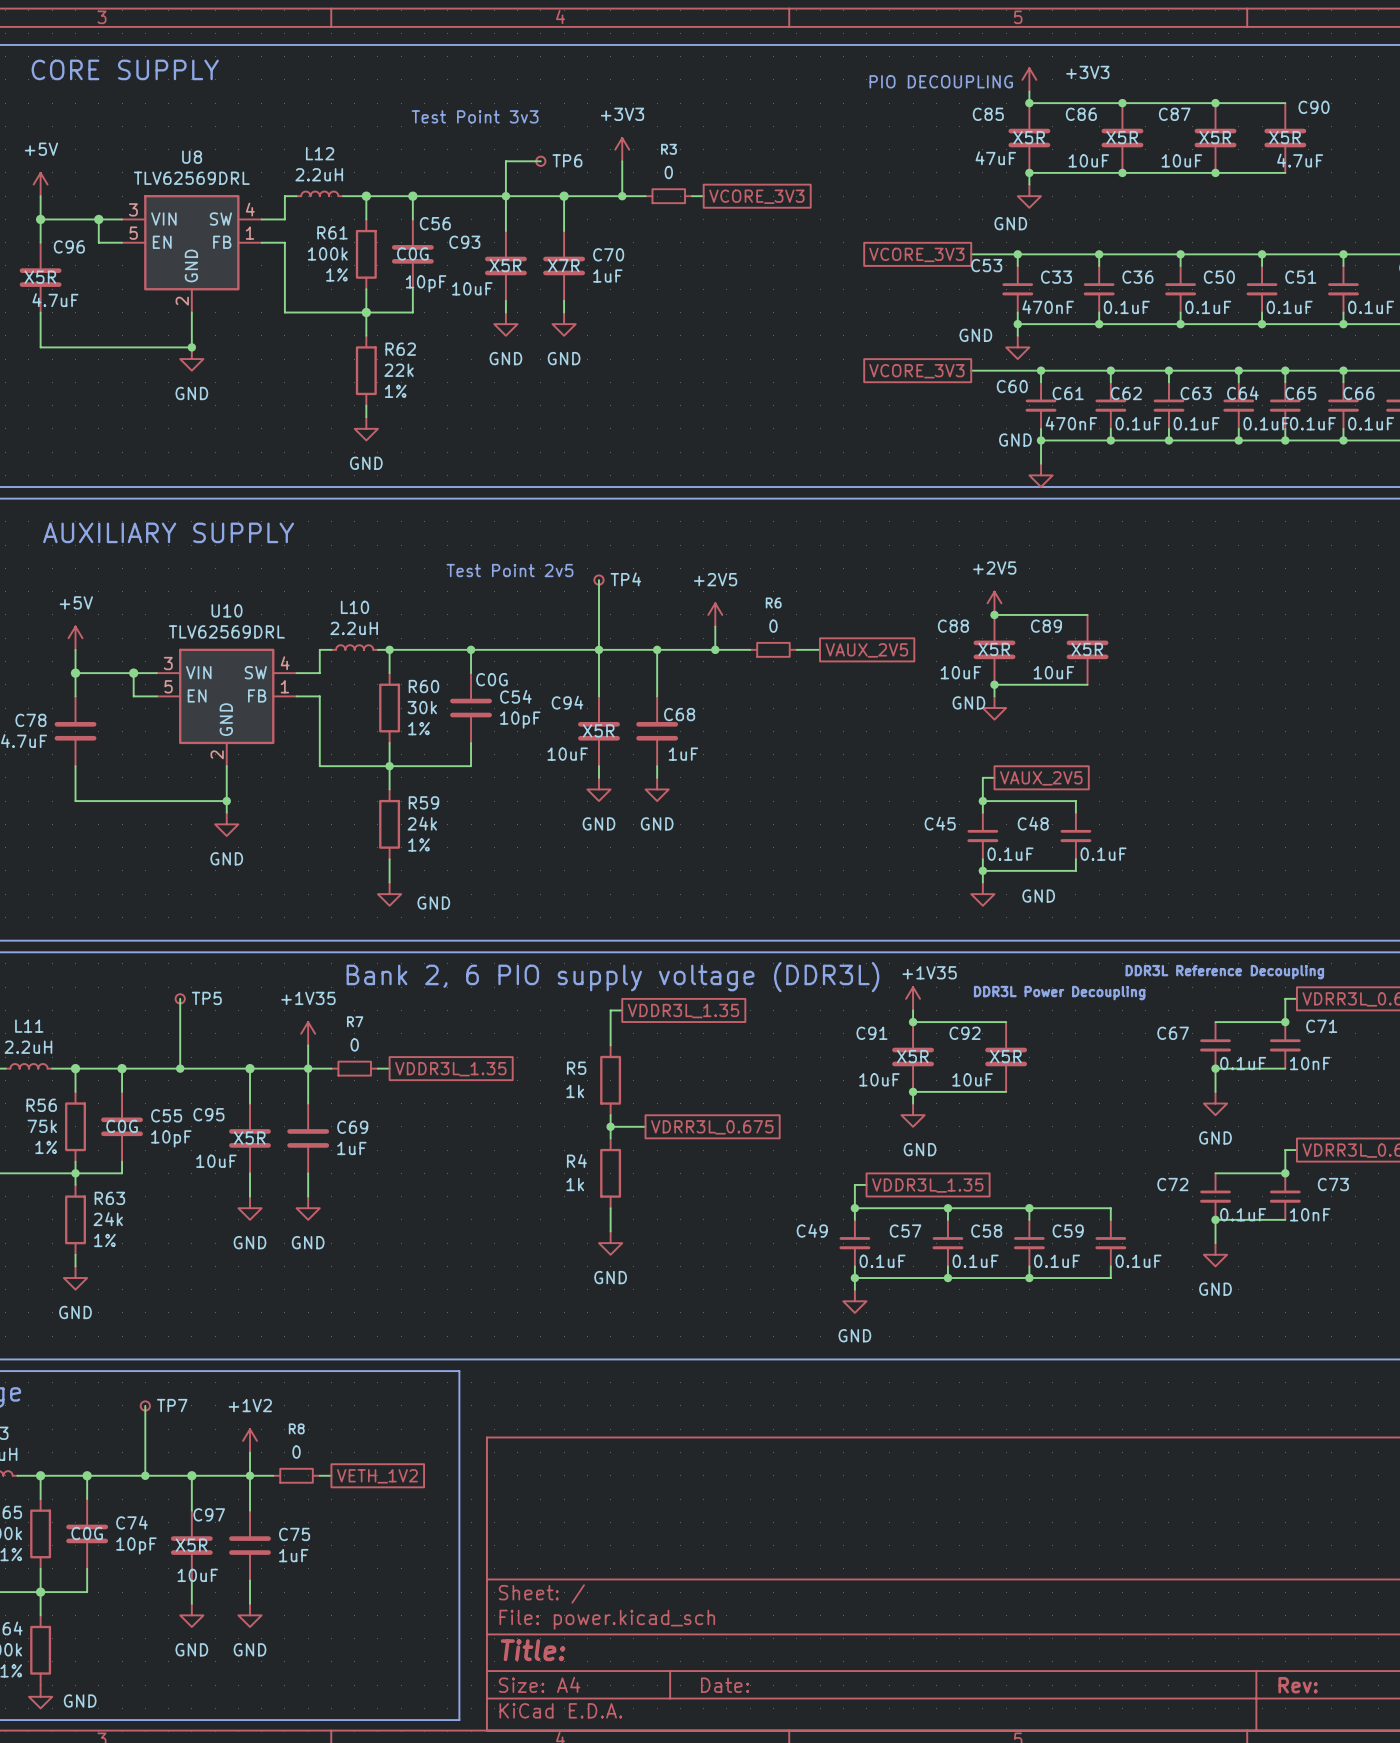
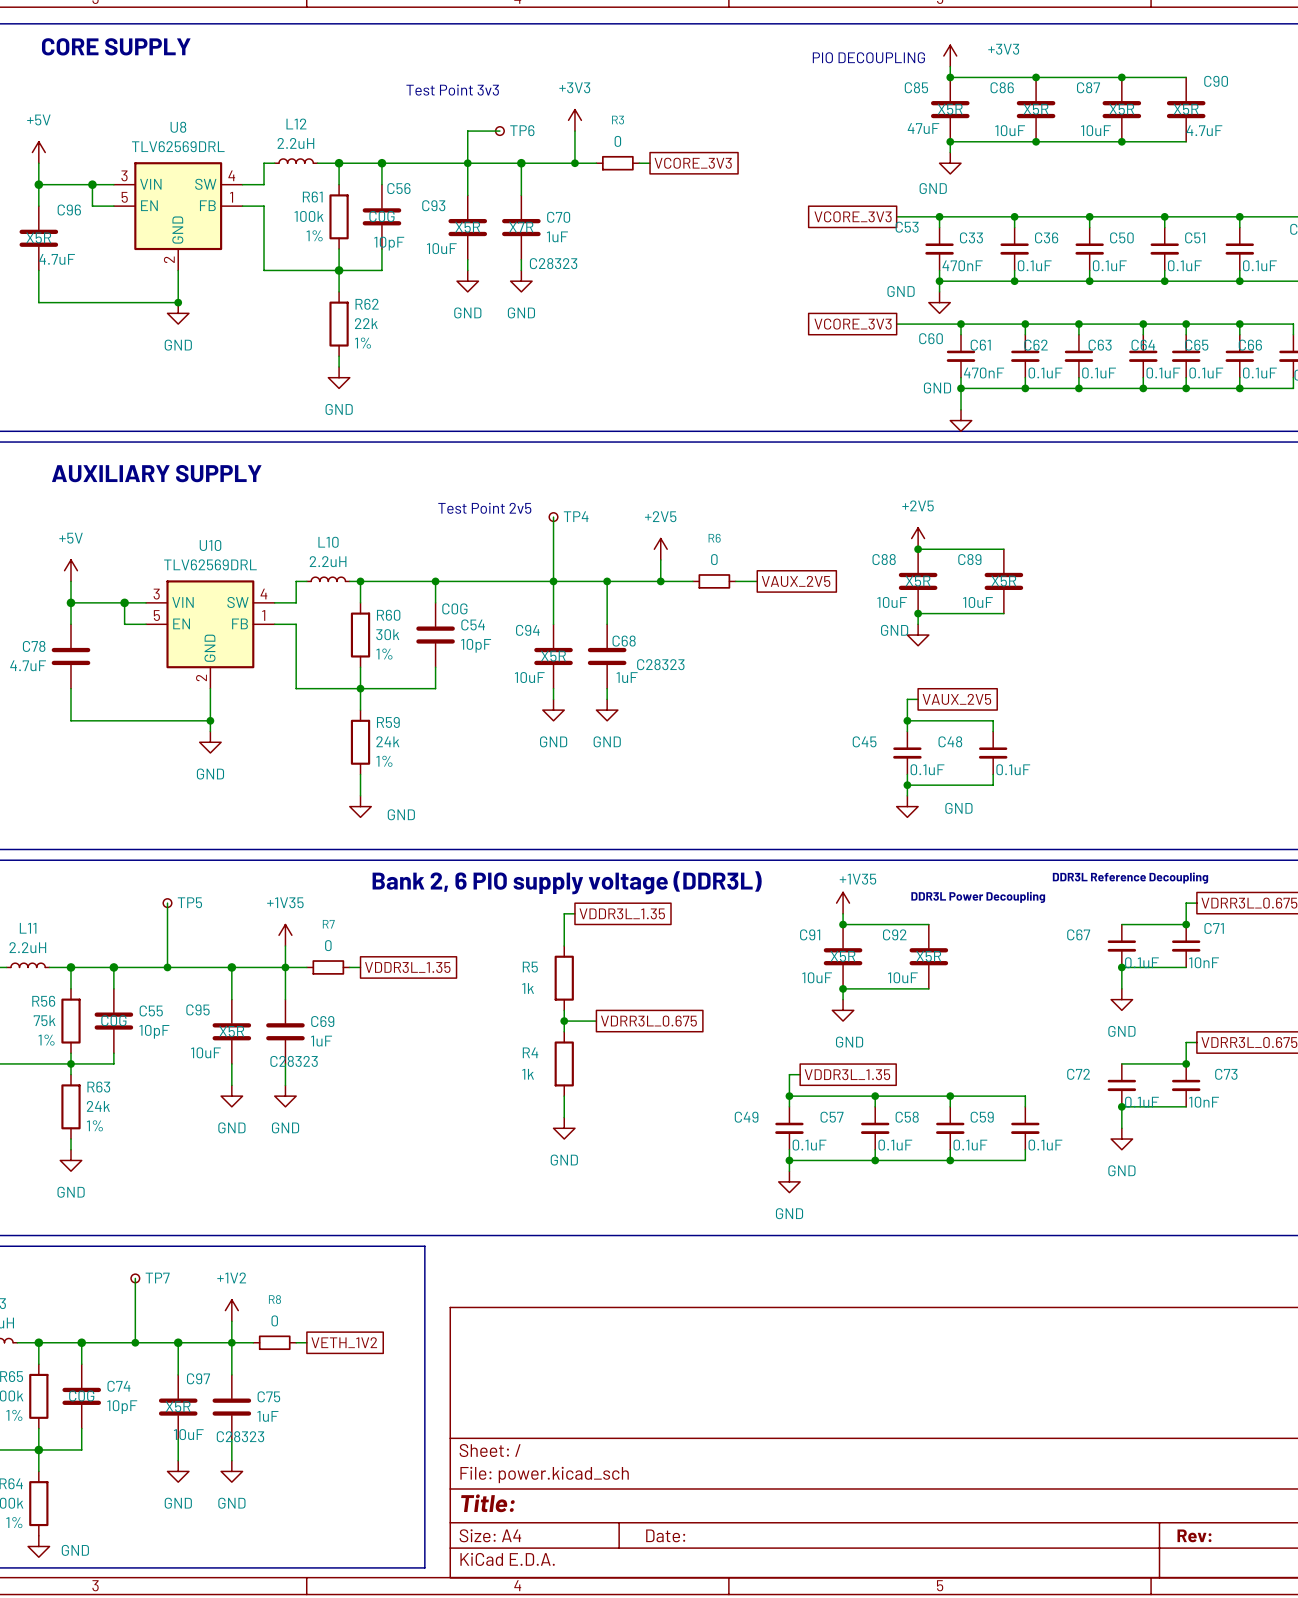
C70 text: none -> C28323 (553, 263)
C68 text: none -> C28323 (660, 664)
C69 text: none -> C28323 (294, 1061)
C75 text: none -> C28323 (240, 1436)

